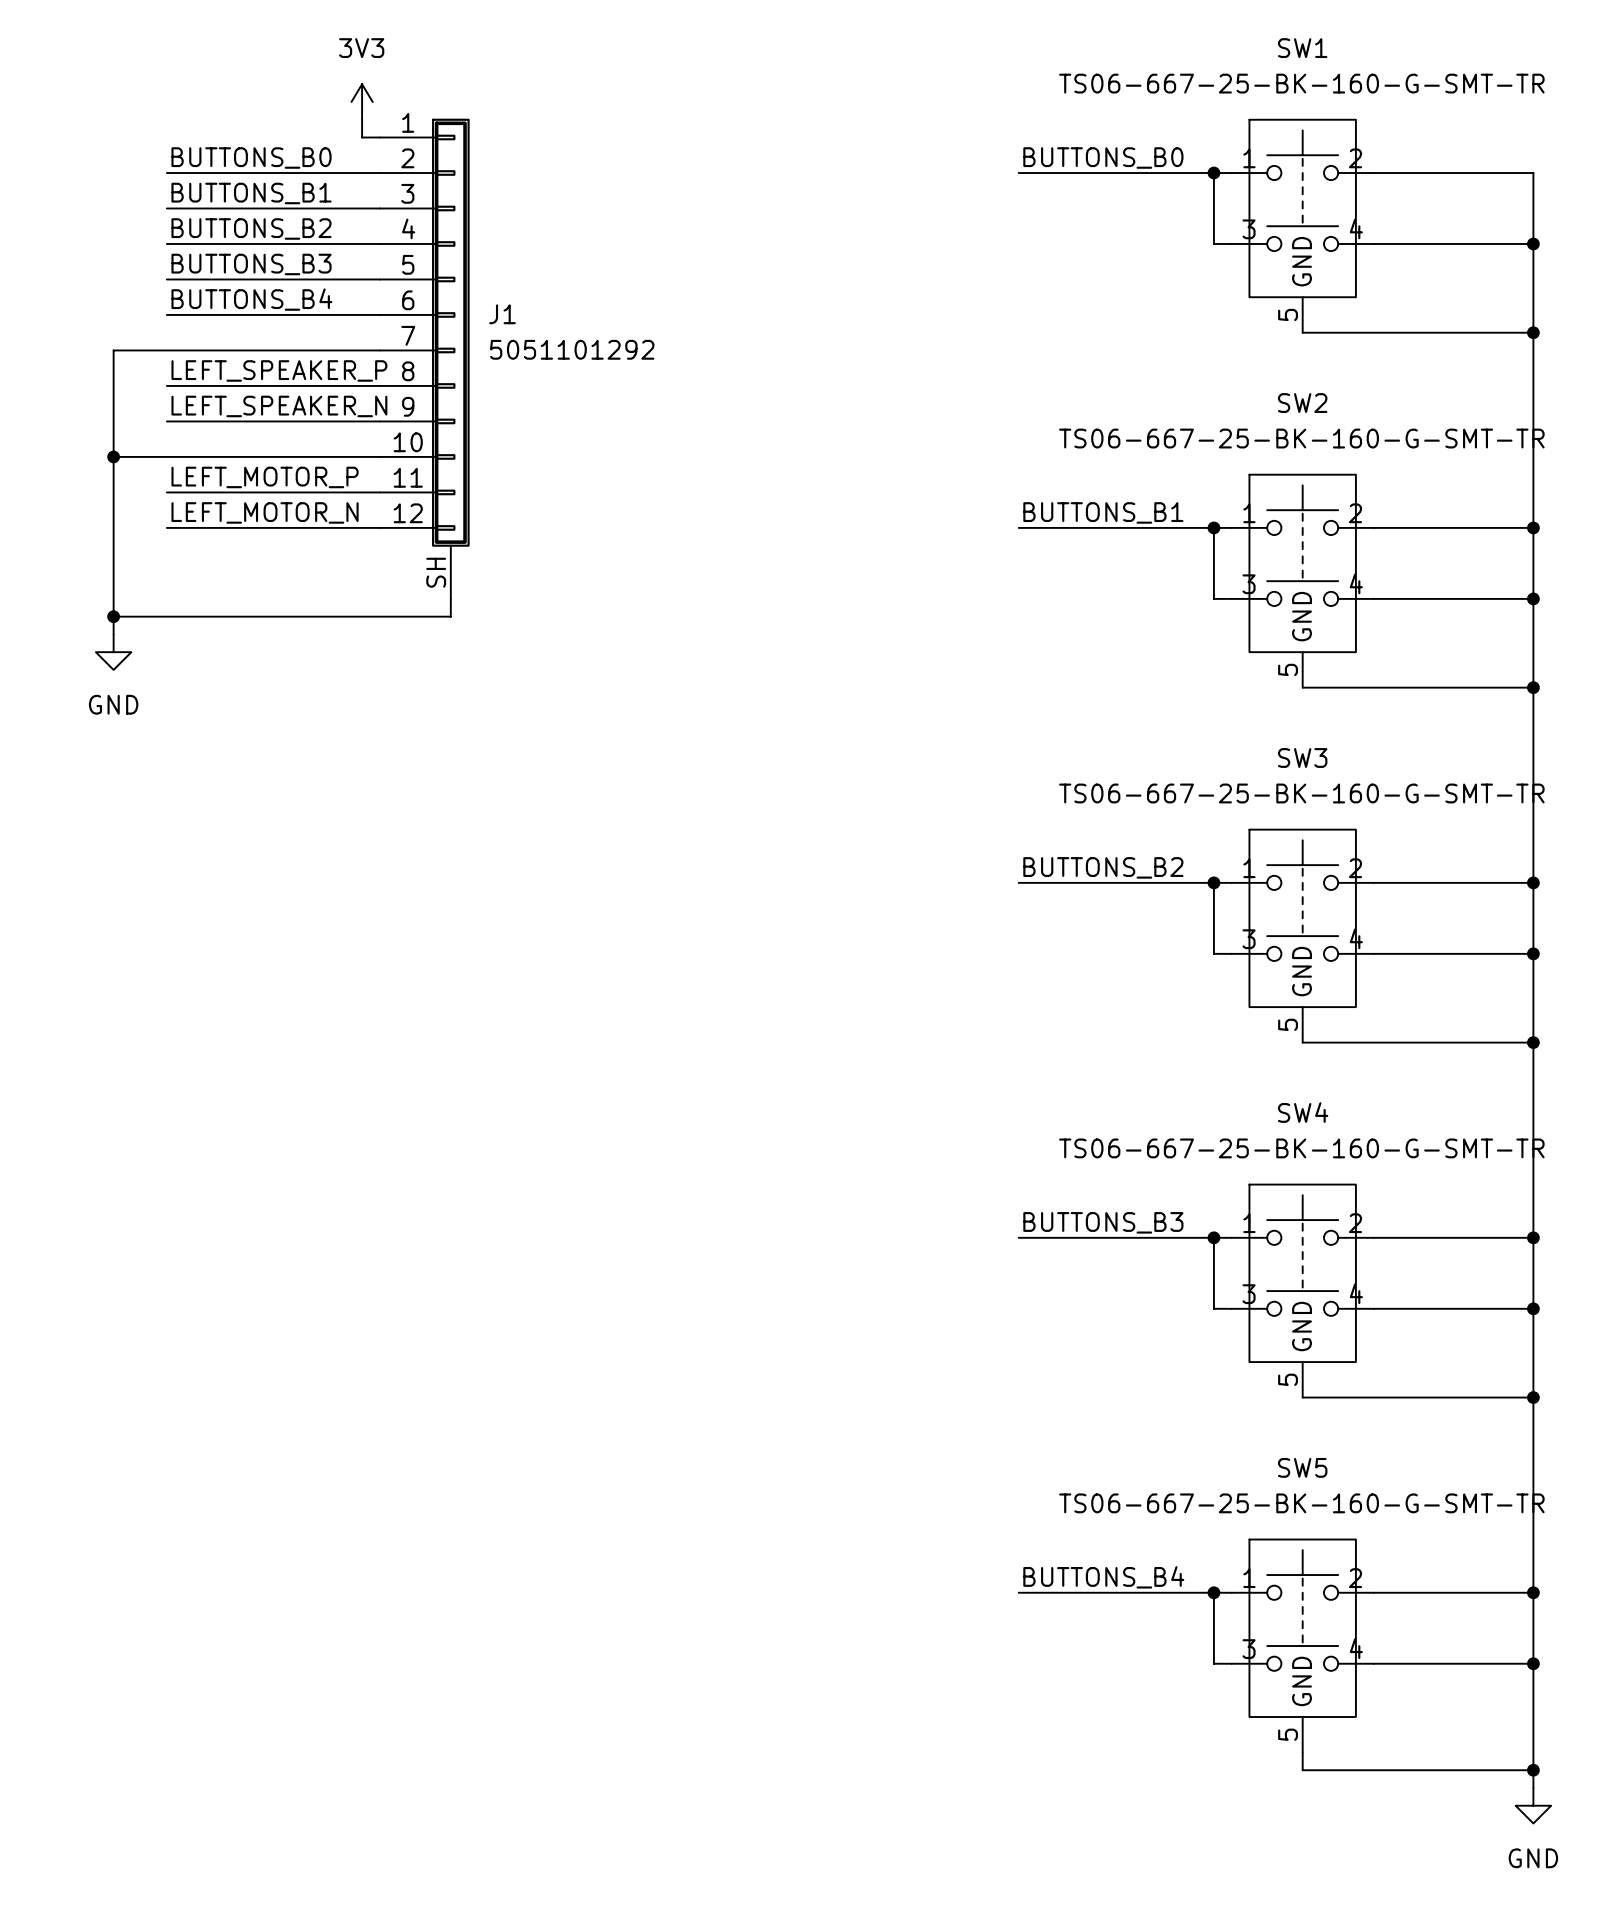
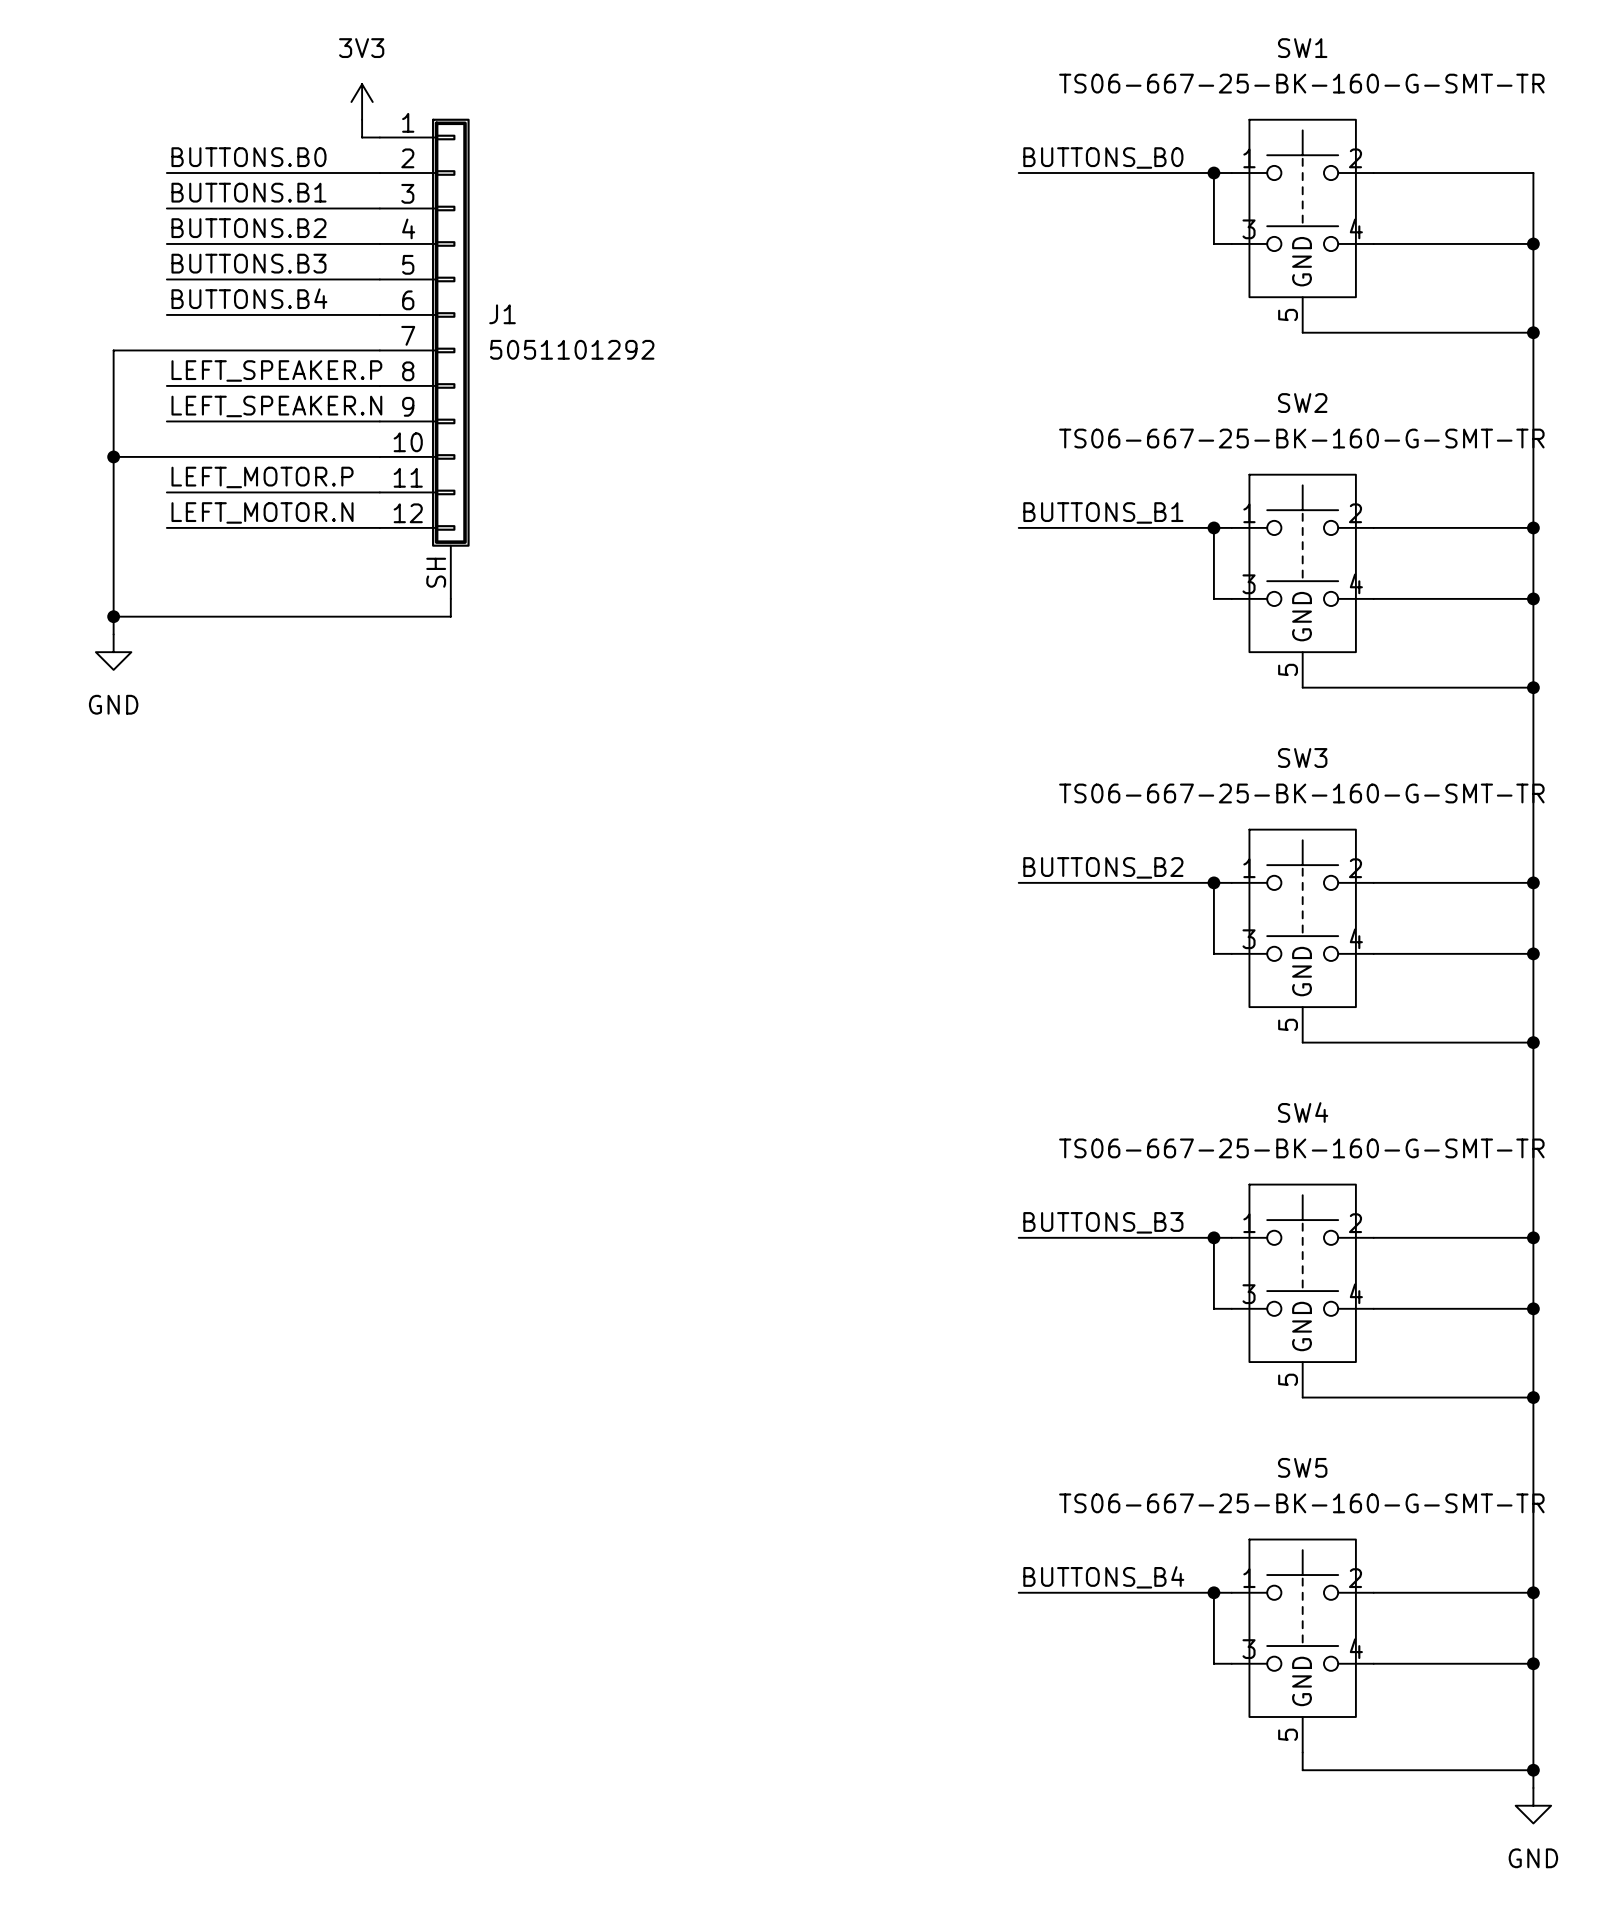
label: BUTTONS_B0 (251, 158) -> BUTTONS.B0 (248, 157)
label: BUTTONS_B1 (251, 193) -> BUTTONS.B1 (248, 192)
label: BUTTONS_B2 (251, 228) -> BUTTONS.B2 (248, 228)
label: BUTTONS_B3 (251, 264) -> BUTTONS.B3 (248, 263)
label: BUTTONS_B4 (251, 299) -> BUTTONS.B4 (249, 298)
label: LEFT_SPEAKER_P (279, 370) -> LEFT_SPEAKER.P (276, 370)
label: LEFT_SPEAKER_N (279, 406) -> LEFT_SPEAKER.N (276, 406)
label: LEFT_MOTOR_P (265, 477) -> LEFT_MOTOR.P (262, 477)
label: LEFT_MOTOR_N (265, 512) -> LEFT_MOTOR.N (262, 512)

